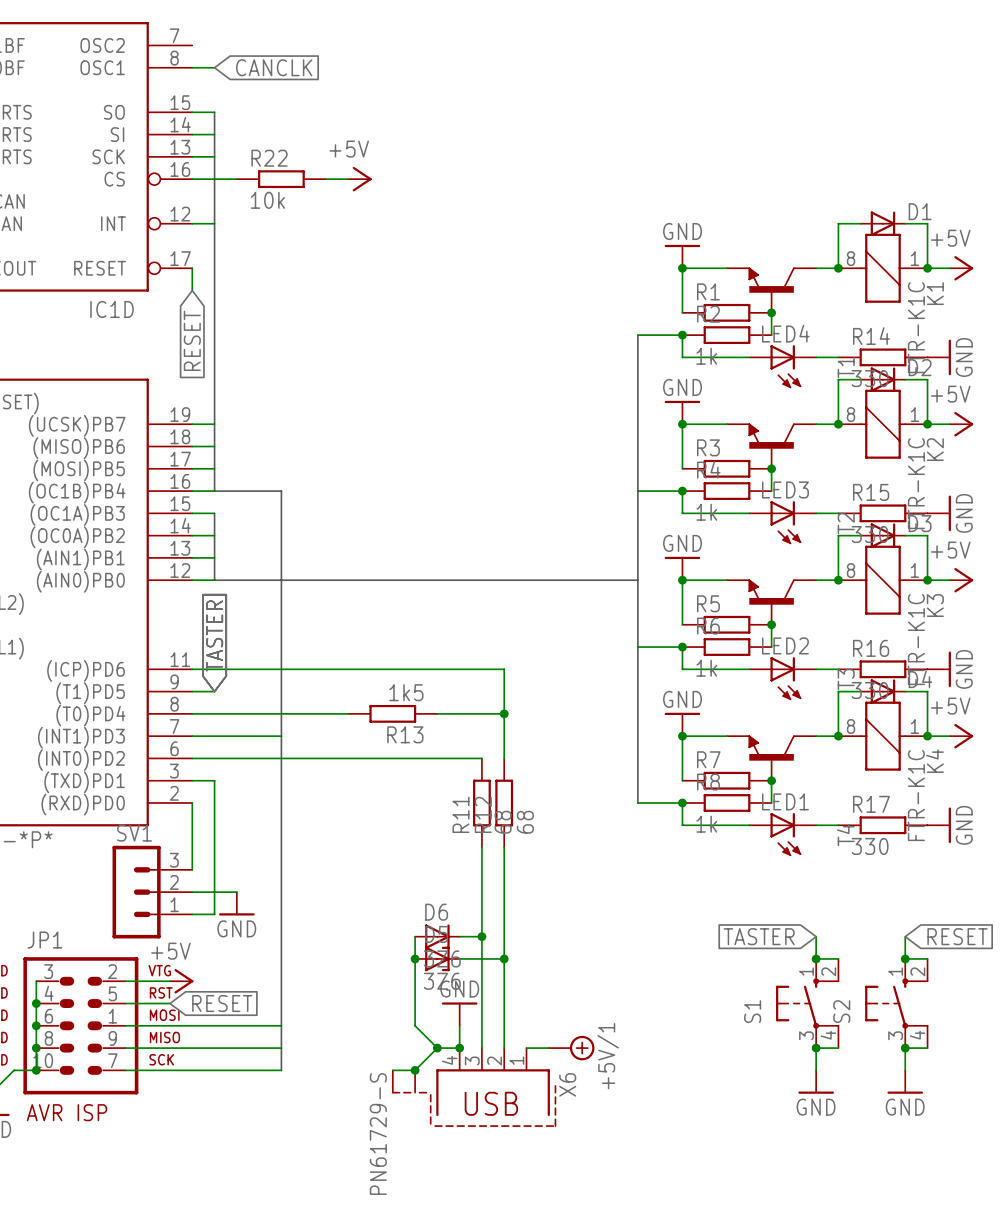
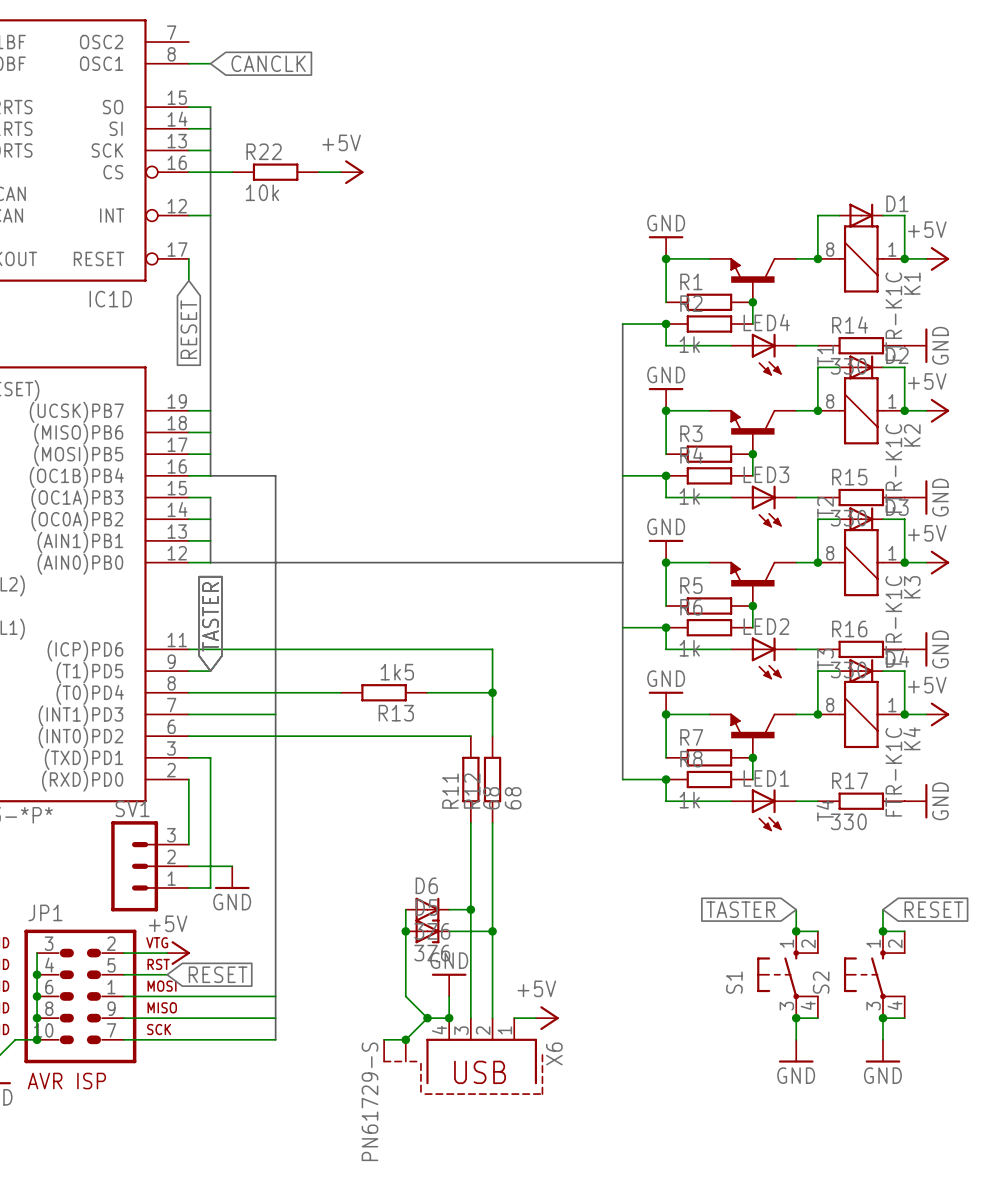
power symbol: none -> +5V (547, 1018)
power symbol: +5V/1 (571, 1048) -> none

